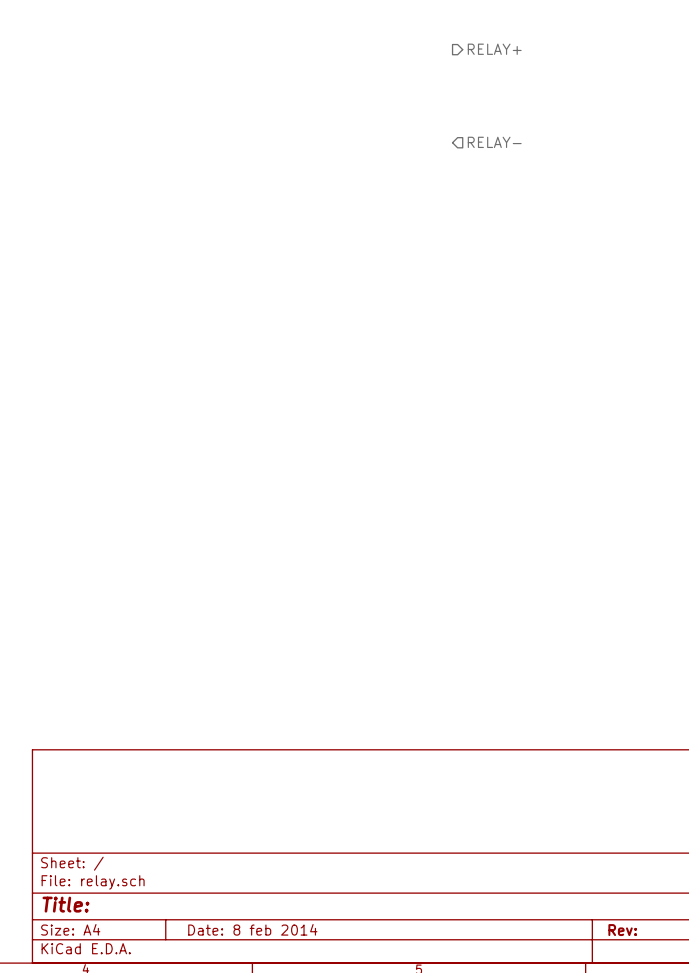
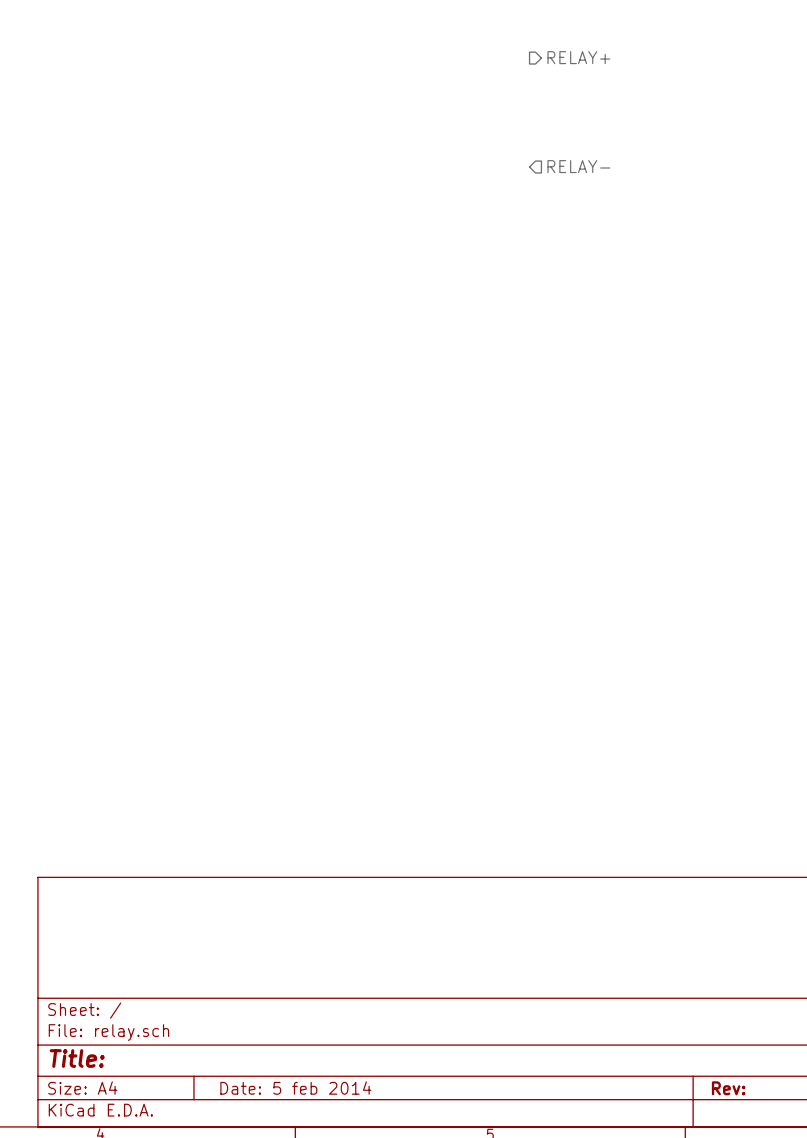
title block: Date: 8 feb 2014 (252, 929) -> Date: 5 feb 2014 (295, 1088)

